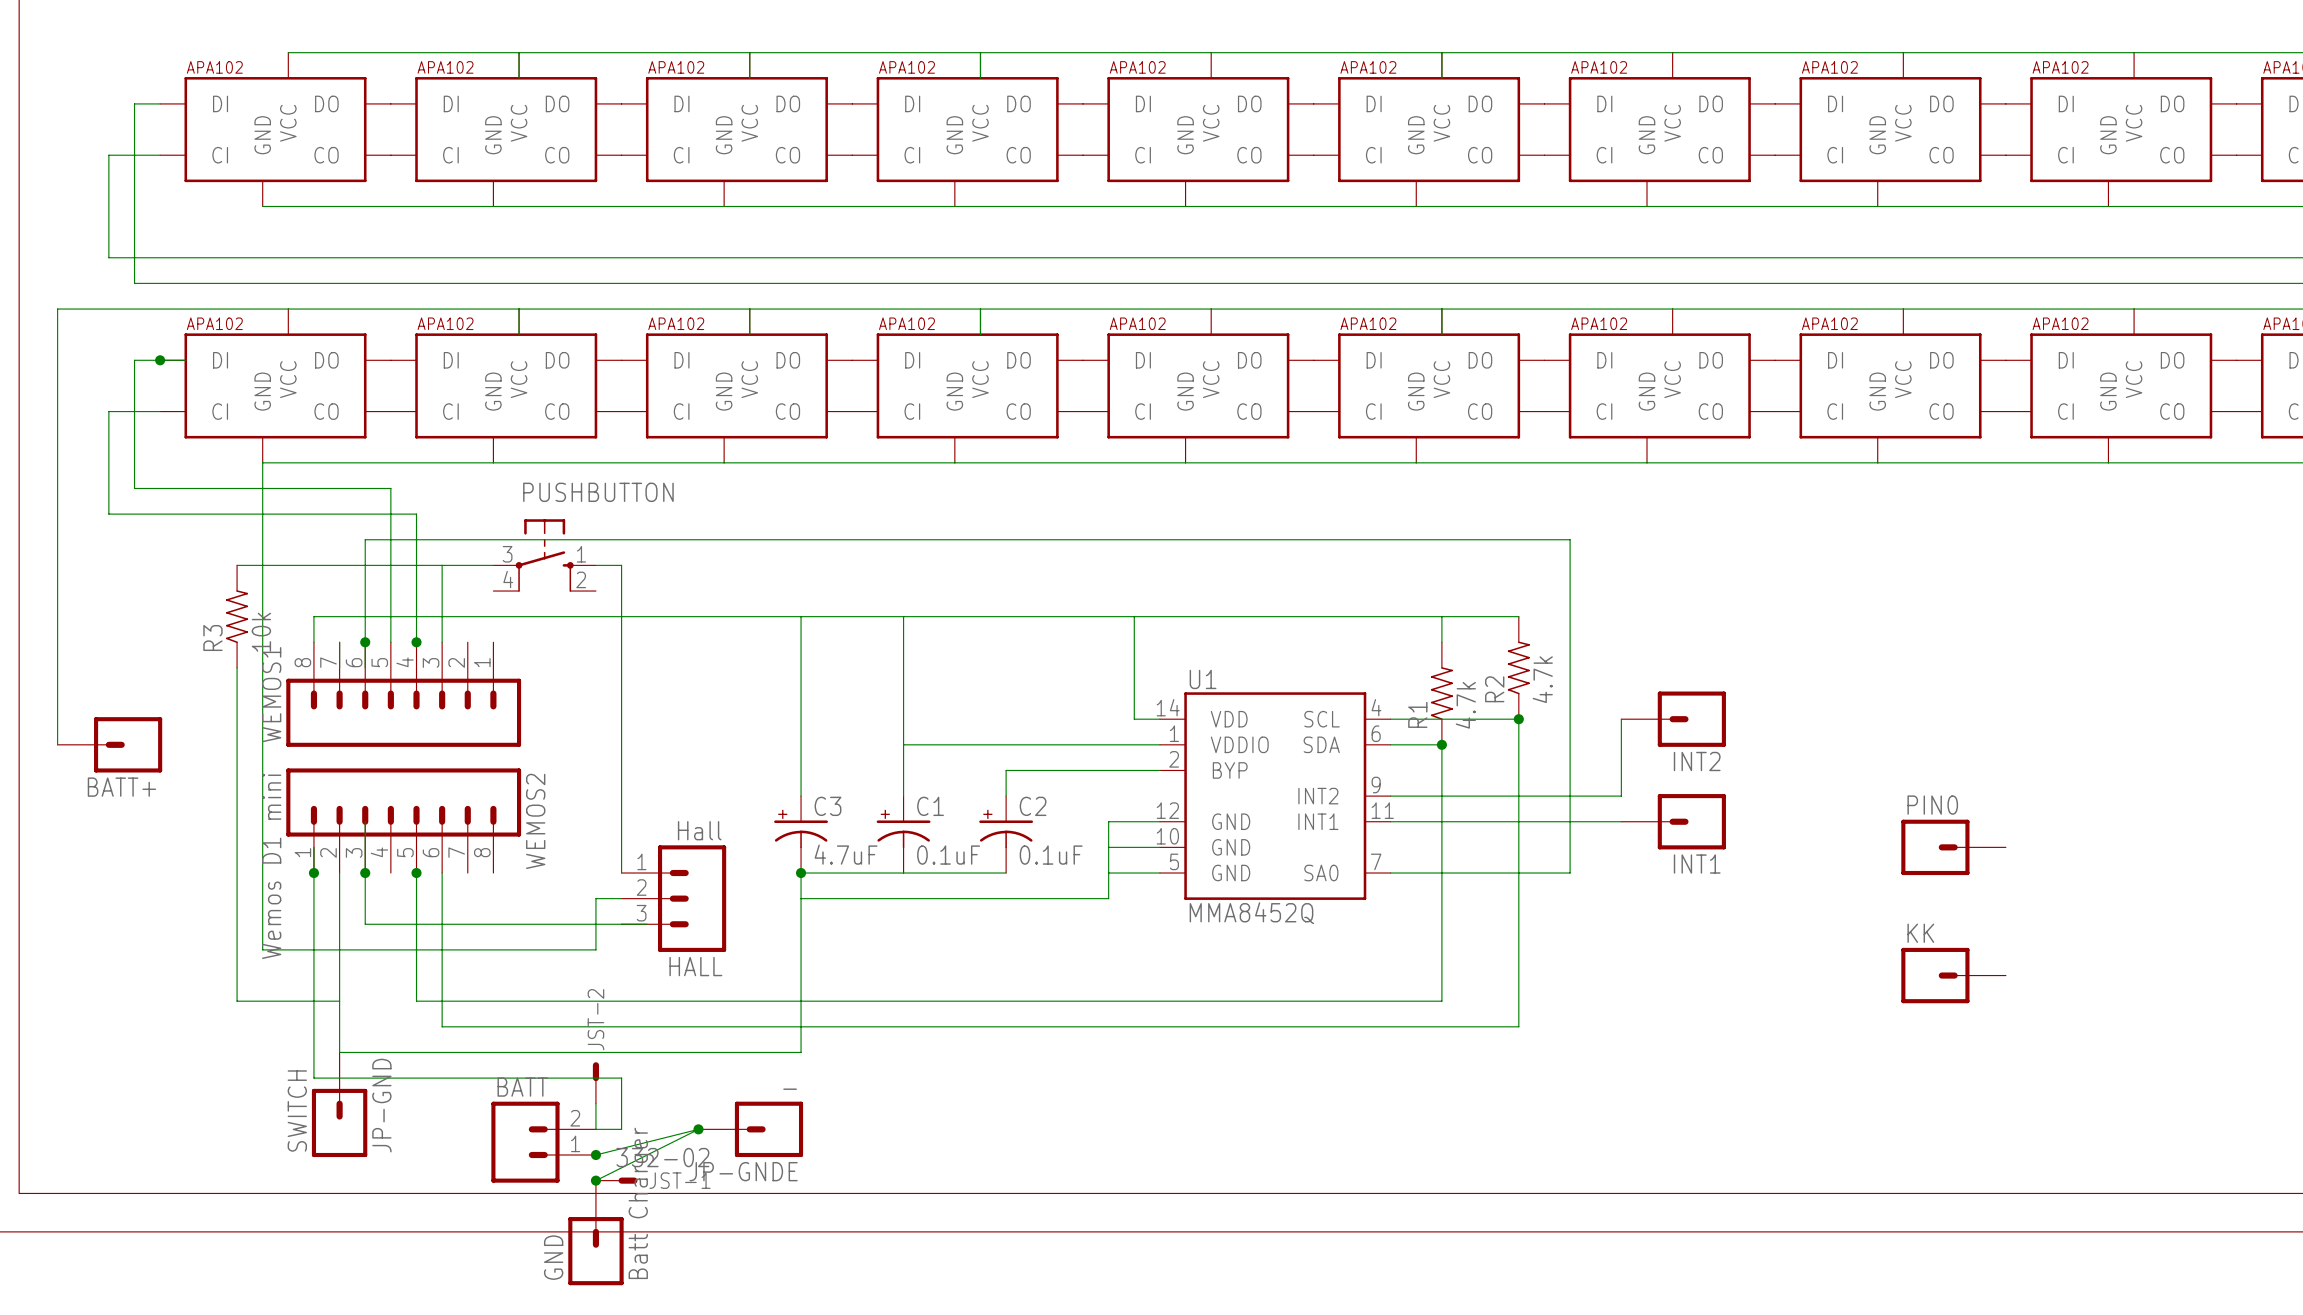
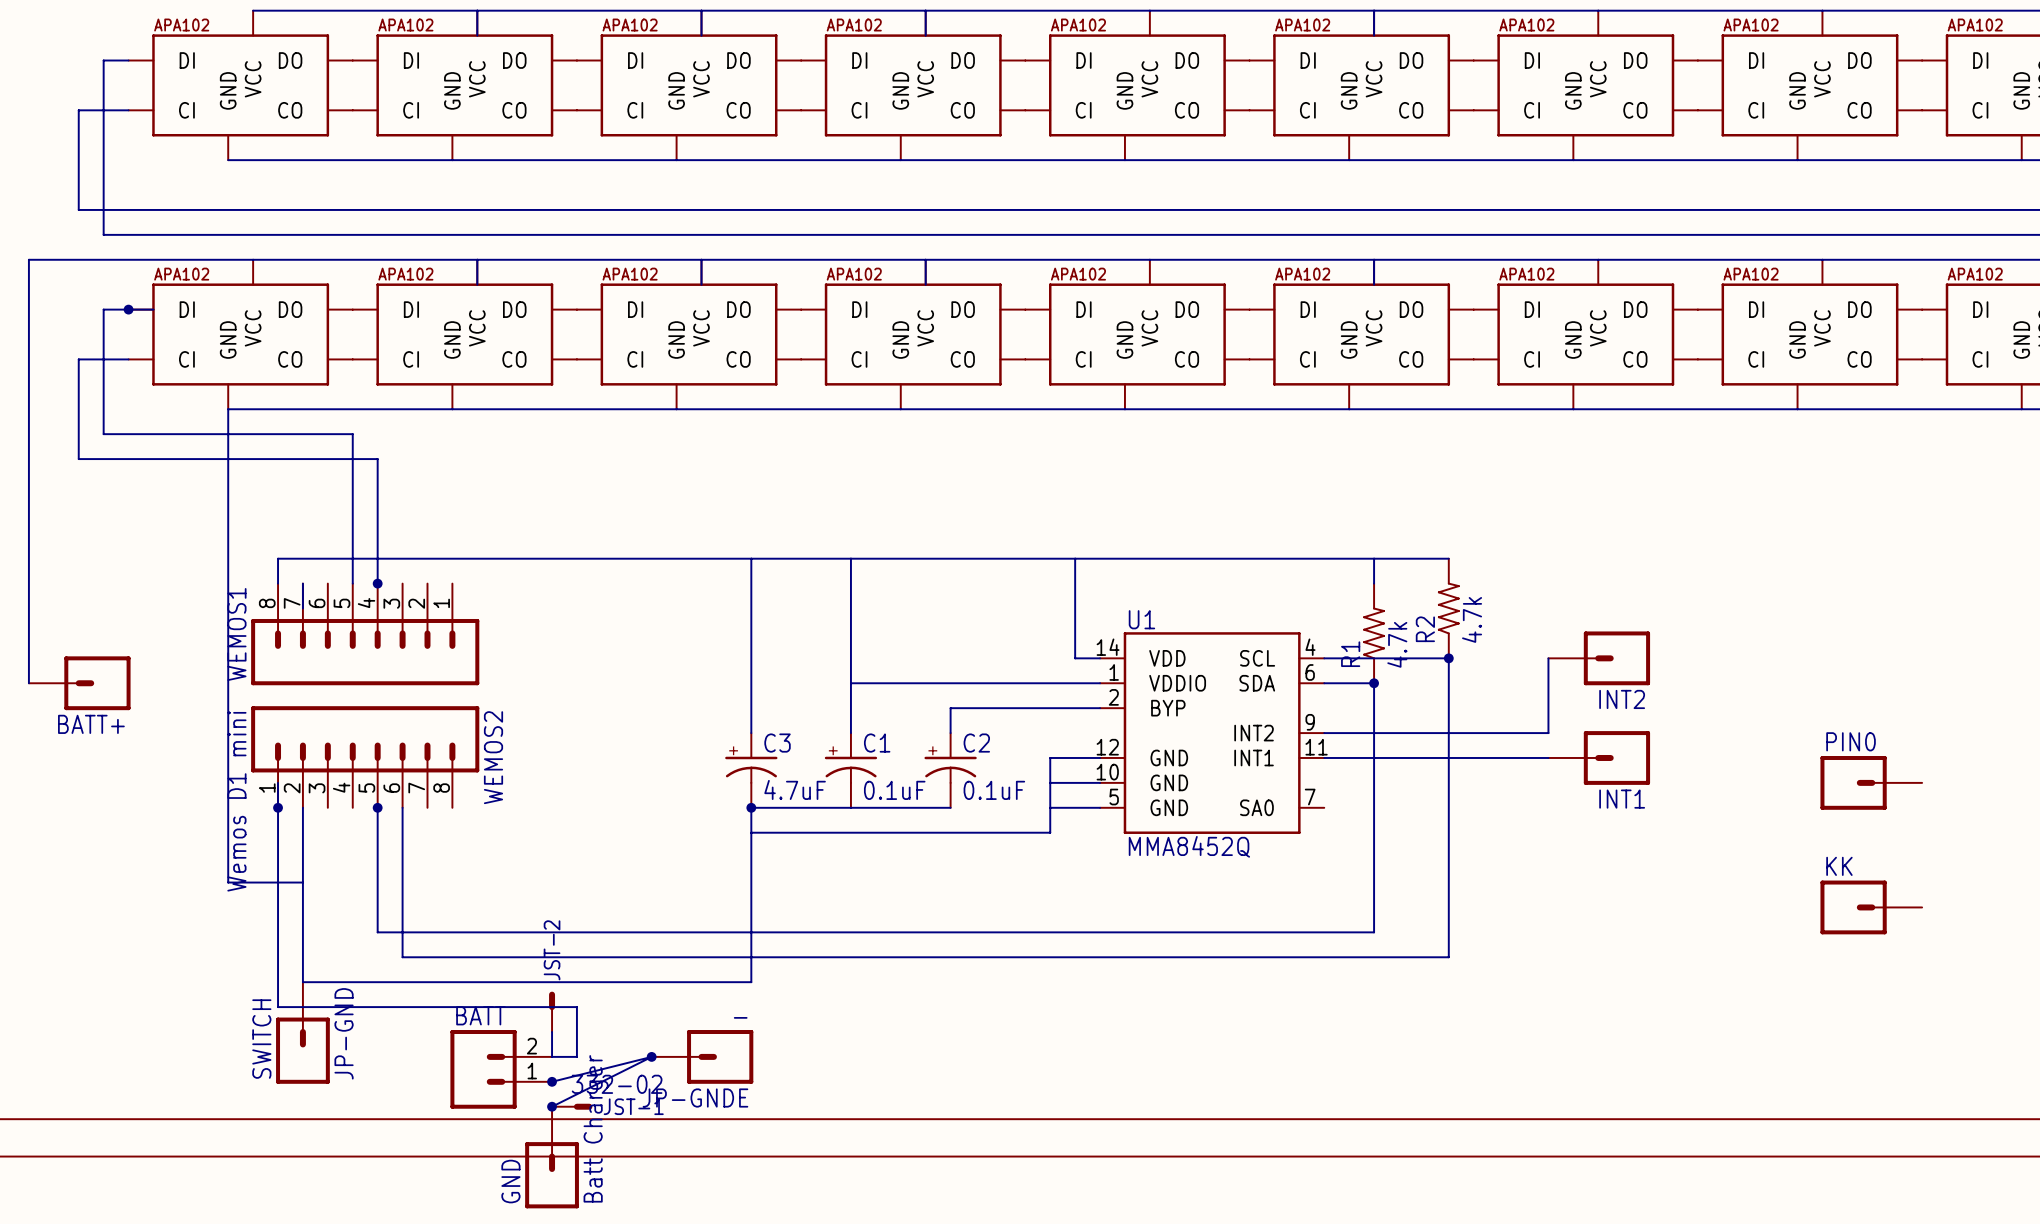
PUSHBUTTON: (544, 555) -> none
wire: (237, 565) (493, 565) -> none
wire: (442, 565) (442, 642) -> none
wire: (595, 565) (621, 565) (621, 873) -> none
R3: 10k (237, 616) -> none
junction: (365, 642) -> none
wire: (237, 667) (237, 1001) (339, 1001) -> none
wire: (365, 667) (365, 539) (1570, 539) (1570, 873) (1390, 873) -> none
wire: (365, 821) (365, 924) (647, 924) -> none
junction: (365, 873) -> none
wire: (621, 898) (595, 898) (595, 949) (339, 949) -> none
HALL: Hall (673, 898) -> none

